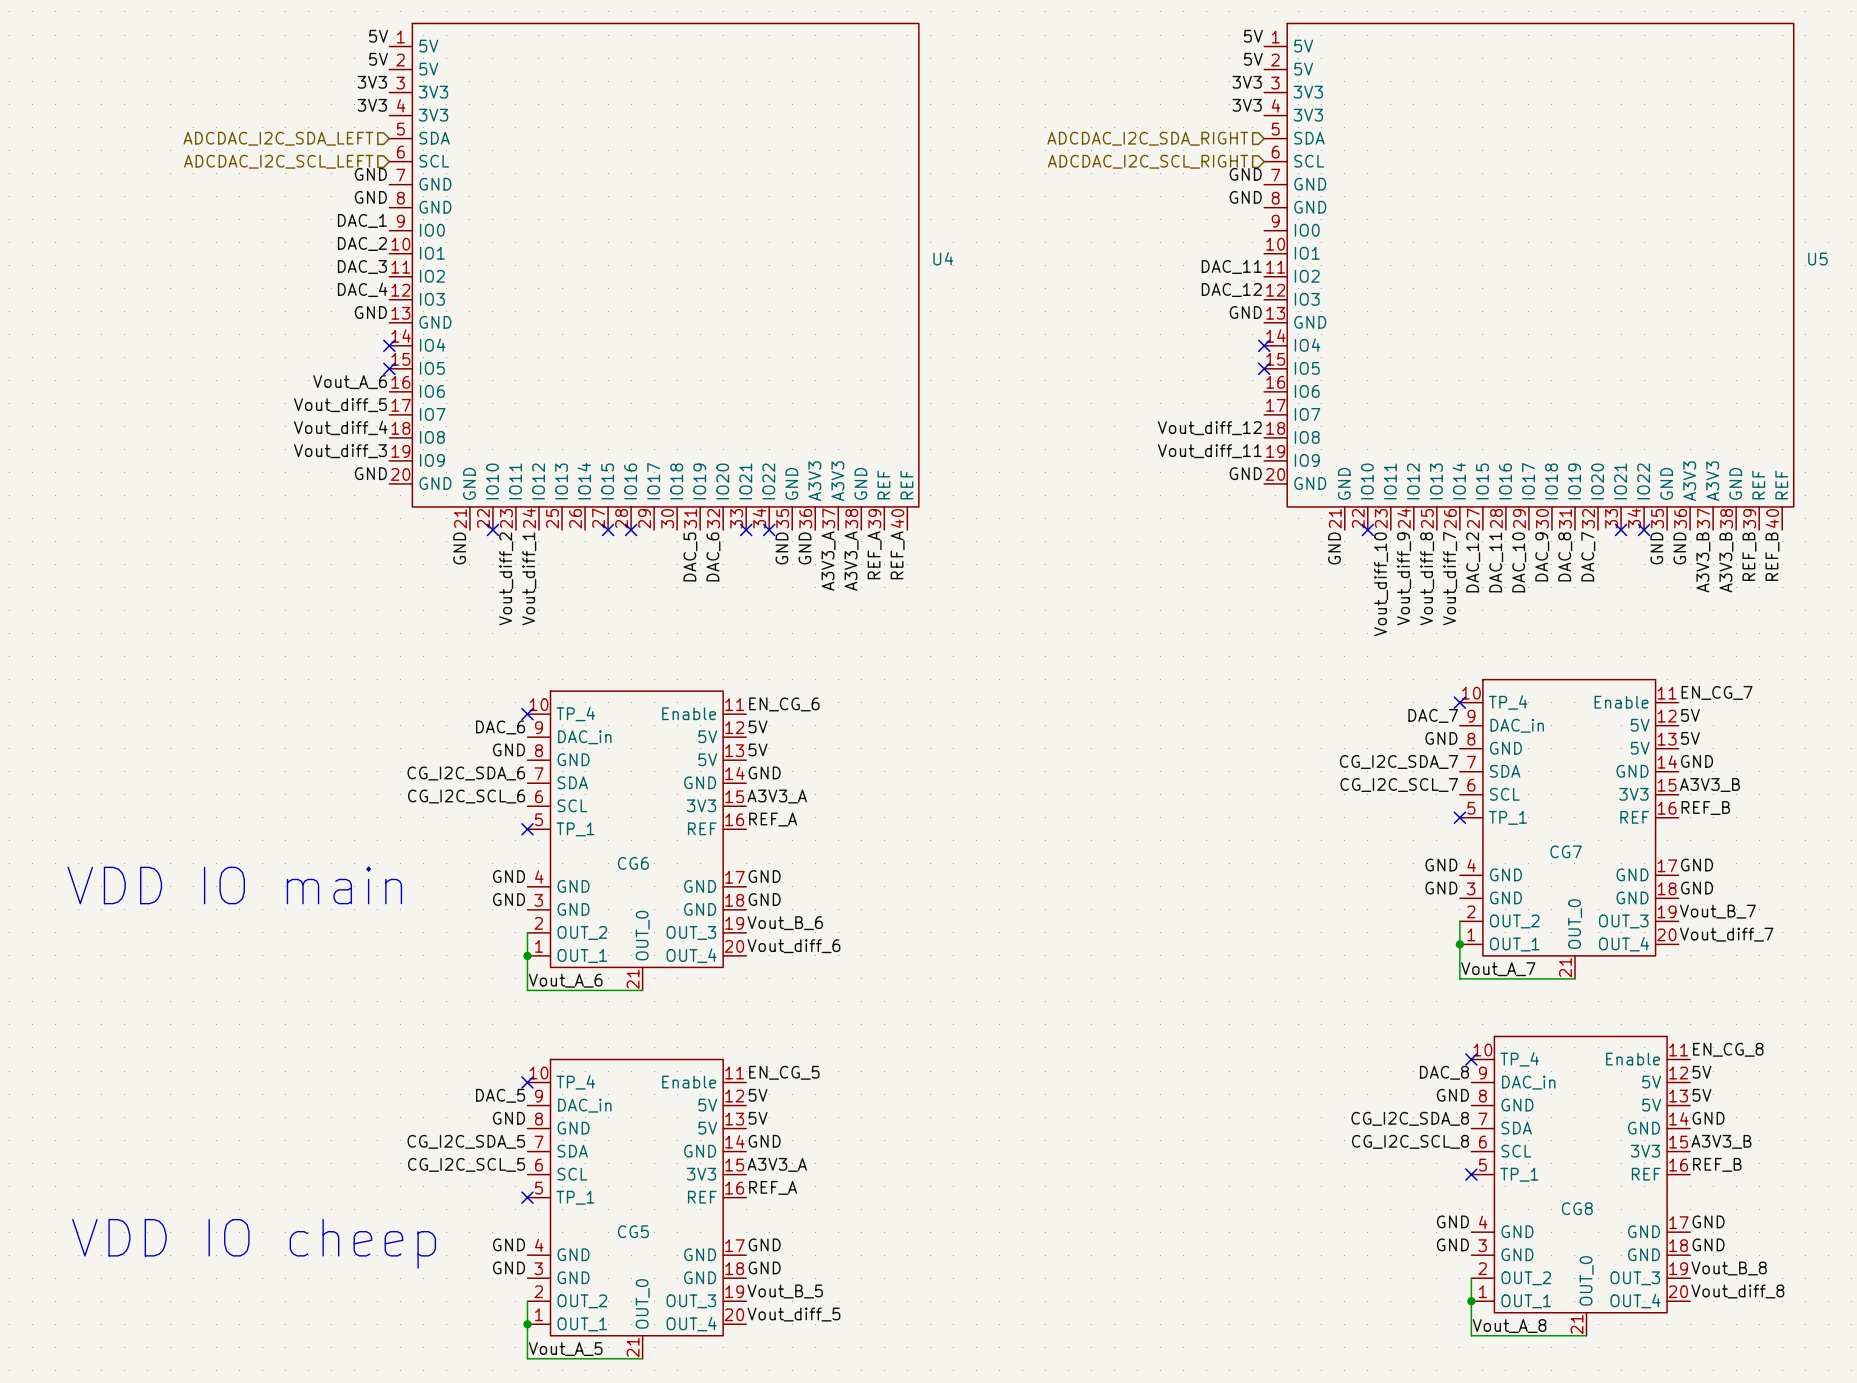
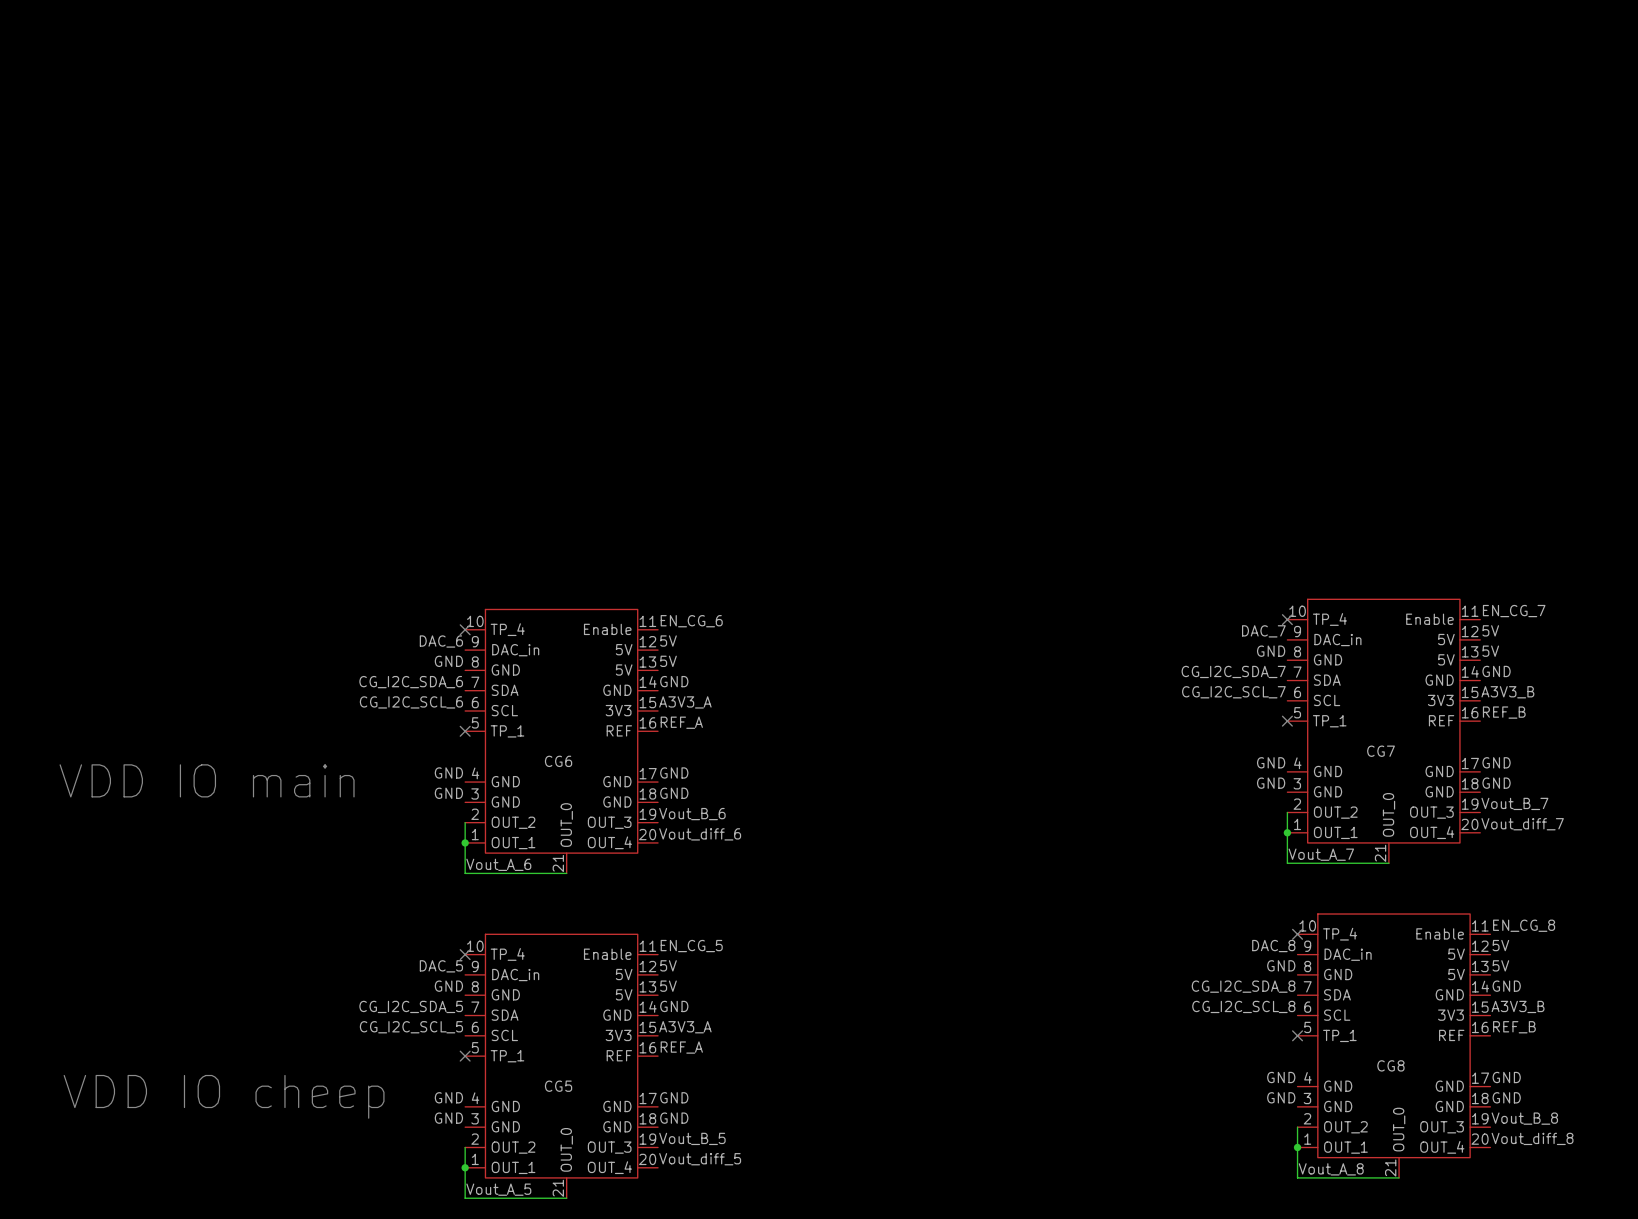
label: 5V (378, 36) -> none
label: 5V (1253, 36) -> none
label: 5V (378, 59) -> none
label: 5V (1253, 59) -> none
label: 3V3 (372, 82) -> none
label: 3V3 (1247, 82) -> none
label: 3V3 (372, 105) -> none
label: 3V3 (1247, 105) -> none
hierarchical label: ADCDAC_I2C_SDA_LEFT (278, 138) -> none
hierarchical label: ADCDAC_I2C_SDA_RIGHT (1147, 138) -> none
hierarchical label: ADCDAC_I2C_SCL_LEFT (278, 161) -> none
hierarchical label: ADCDAC_I2C_SCL_RIGHT (1148, 161) -> none
label: GND (370, 174) -> none
label: GND (1245, 174) -> none
label: GND (370, 197) -> none
label: GND (1245, 197) -> none
label: DAC_1 (362, 220) -> none
label: DAC_2 (362, 243) -> none
label: DAC_3 (362, 267) -> none
label: DAC_11 (1231, 267) -> none
U4: (654, 276) -> none
U5: (1528, 276) -> none
label: DAC_4 (362, 289) -> none
label: DAC_12 (1231, 290) -> none
label: GND (370, 312) -> none
label: GND (1245, 312) -> none
no-connect mark: (389, 345) -> none
no-connect mark: (1264, 345) -> none
no-connect mark: (389, 368) -> none
no-connect mark: (1264, 368) -> none
label: Vout_A_6 (350, 382) -> none
label: Vout_diff_5 (340, 405) -> none
label: Vout_diff_4 (340, 427) -> none
label: Vout_diff_12 (1209, 428) -> none
label: Vout_diff_3 (340, 451) -> none
label: Vout_diff_11 (1209, 451) -> none
label: GND (370, 473) -> none
label: GND (1245, 473) -> none
no-connect mark: (492, 529) -> none
no-connect mark: (608, 529) -> none
no-connect mark: (631, 529) -> none
no-connect mark: (746, 529) -> none
no-connect mark: (769, 529) -> none
no-connect mark: (1367, 529) -> none
no-connect mark: (1621, 529) -> none
no-connect mark: (1644, 529) -> none
label: GND (459, 548) -> none
label: GND (781, 548) -> none
label: GND (804, 548) -> none
label: GND (1334, 548) -> none
label: GND (1656, 548) -> none
label: GND (1679, 548) -> none
label: REF_A (874, 555) -> none
label: REF_A (897, 555) -> none
label: DAC_5 (690, 556) -> none
label: DAC_6 (713, 556) -> none
label: DAC_9 (1542, 556) -> none
label: DAC_8 (1565, 556) -> none
label: DAC_7 (1588, 556) -> none
label: REF_B (1749, 556) -> none
label: REF_B (1772, 556) -> none
label: A3V3_A (828, 561) -> none
label: A3V3_A (851, 561) -> none
label: DAC_12 (1473, 562) -> none
label: DAC_11 (1496, 562) -> none
label: DAC_10 (1519, 562) -> none
label: A3V3_B (1703, 562) -> none
label: A3V3_B (1726, 562) -> none
label: Vout_diff_2 (506, 578) -> none
label: Vout_diff_1 (529, 578) -> none
label: Vout_diff_9 (1404, 578) -> none
label: Vout_diff_8 (1427, 578) -> none
label: Vout_diff_7 (1450, 578) -> none
label: Vout_diff_10 (1381, 584) -> none

